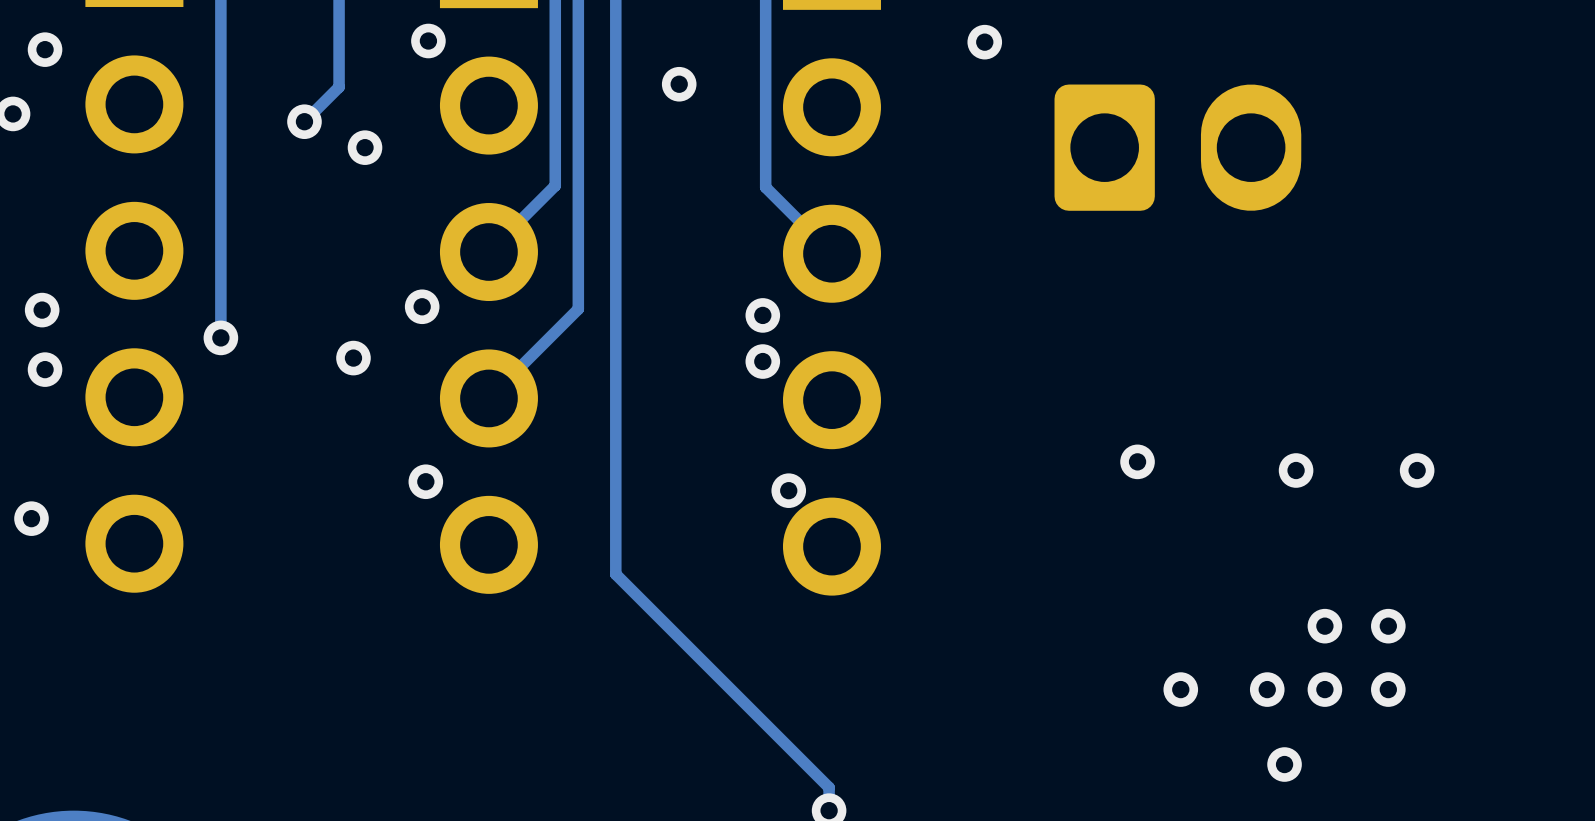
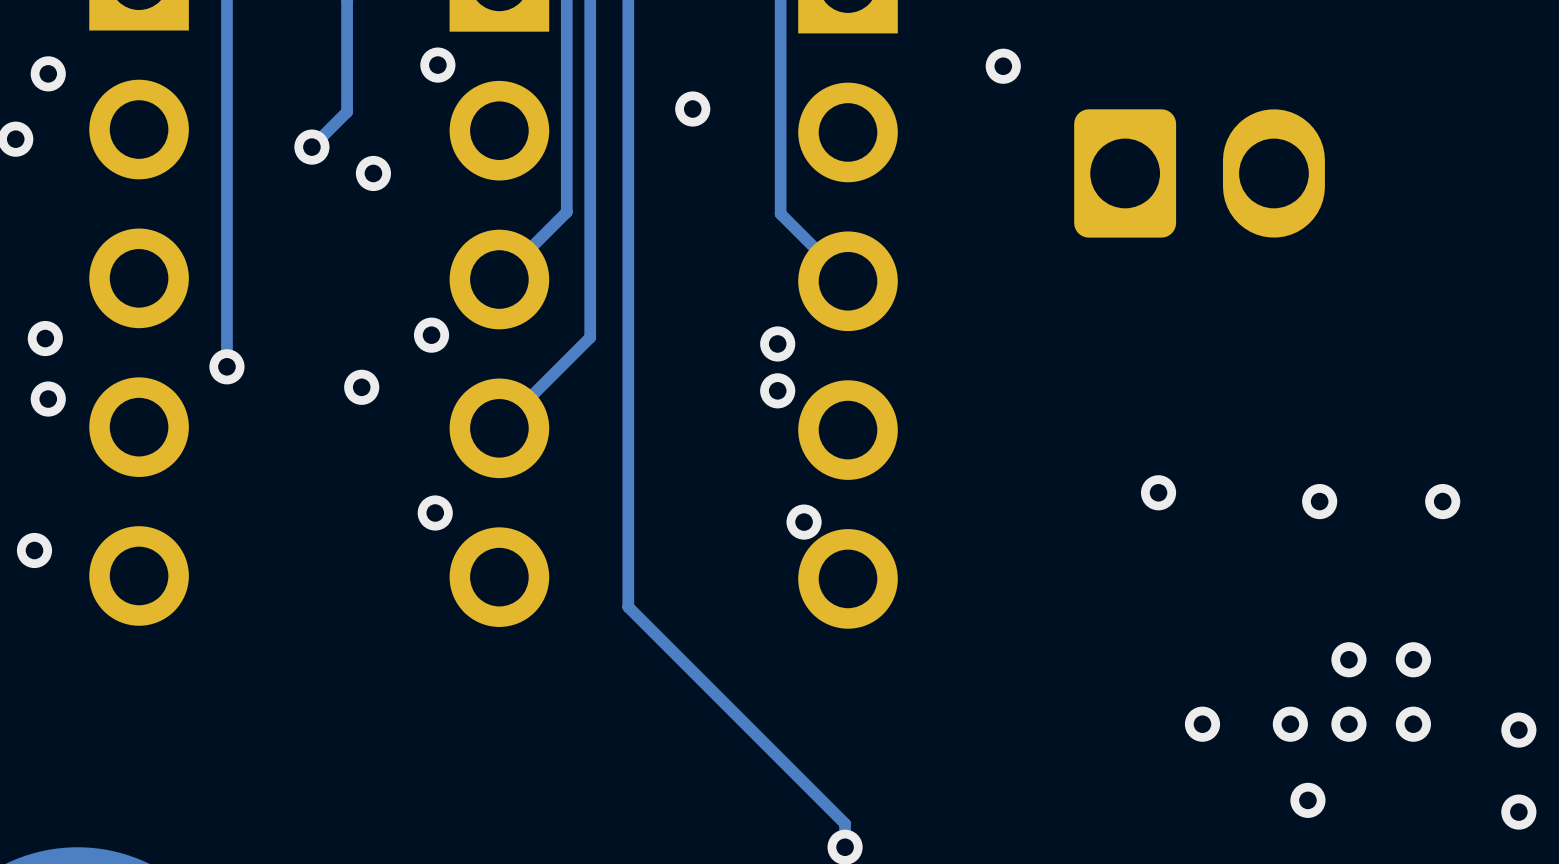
via: none -> (1518, 730)
via: none -> (1518, 812)

